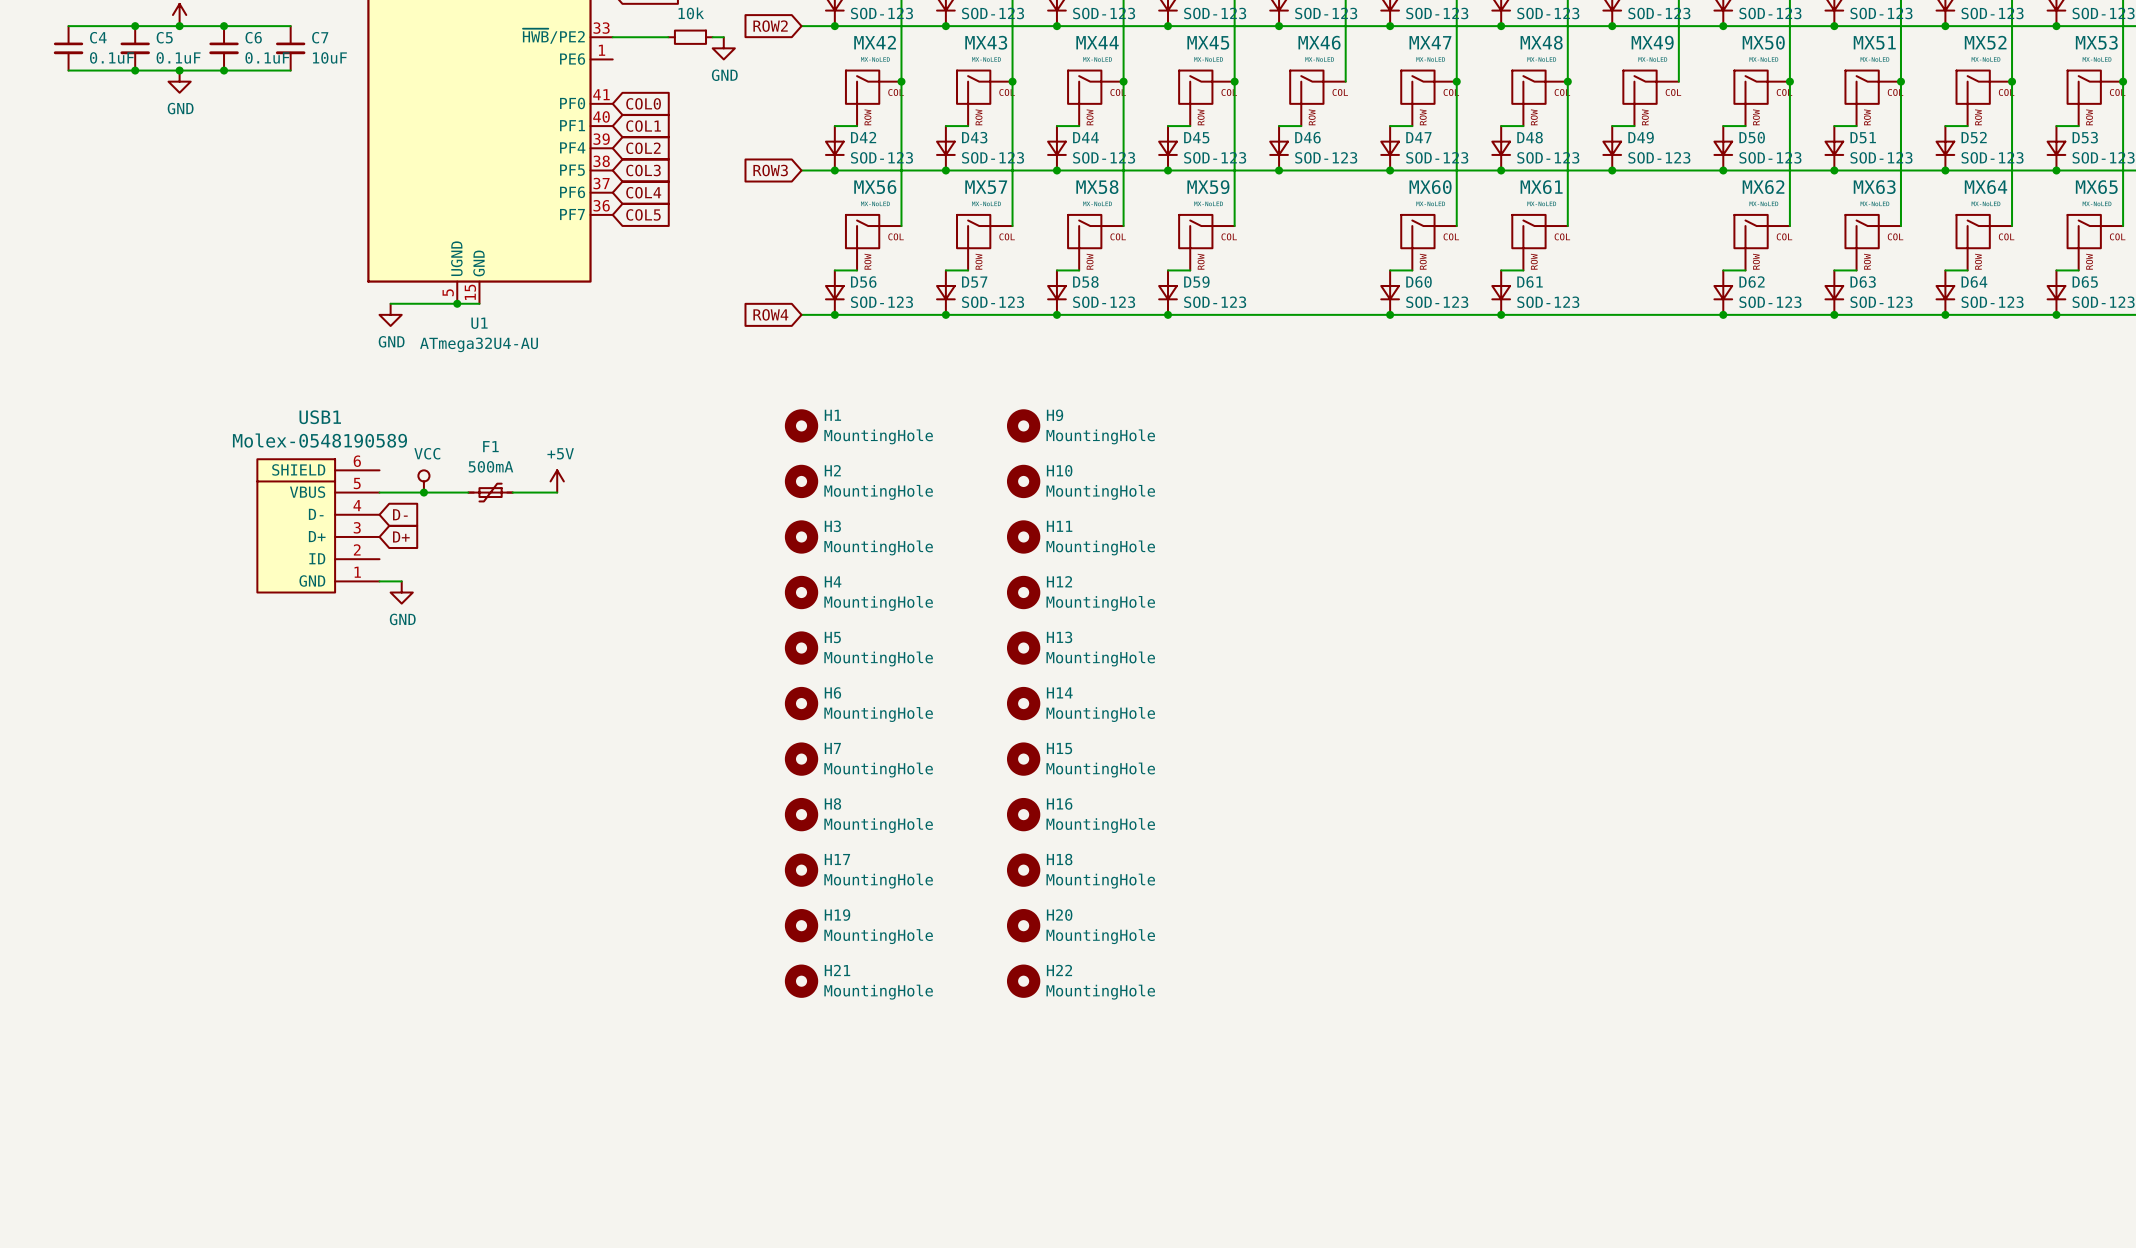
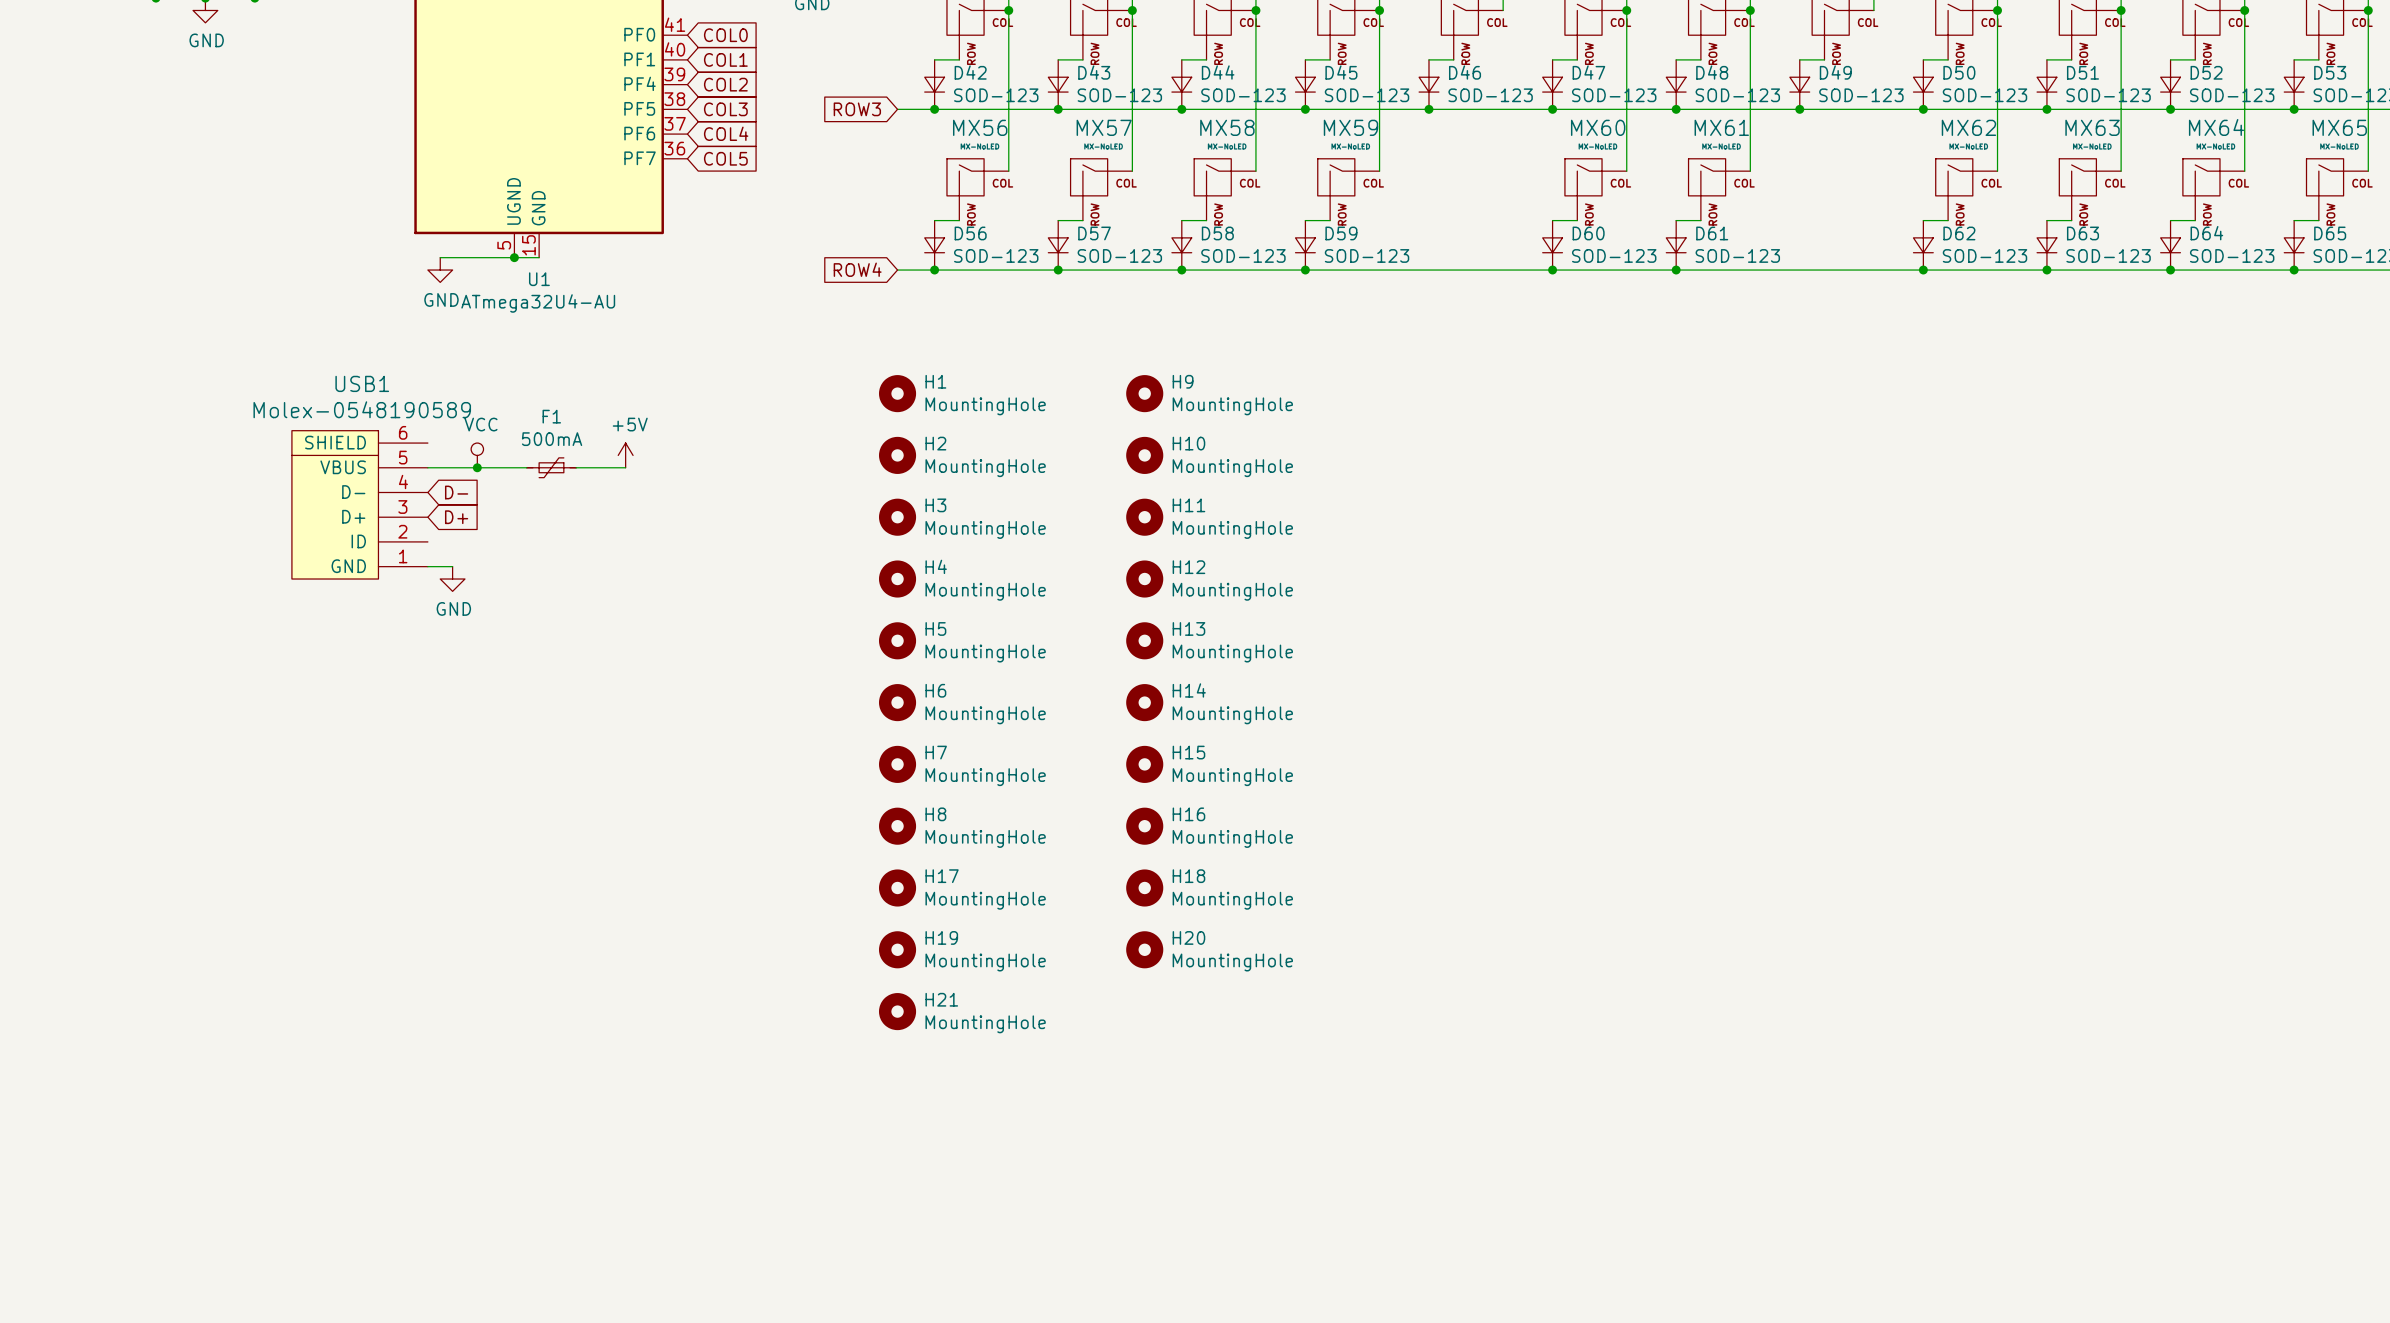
H22: MountingHole (1023, 981) -> none

